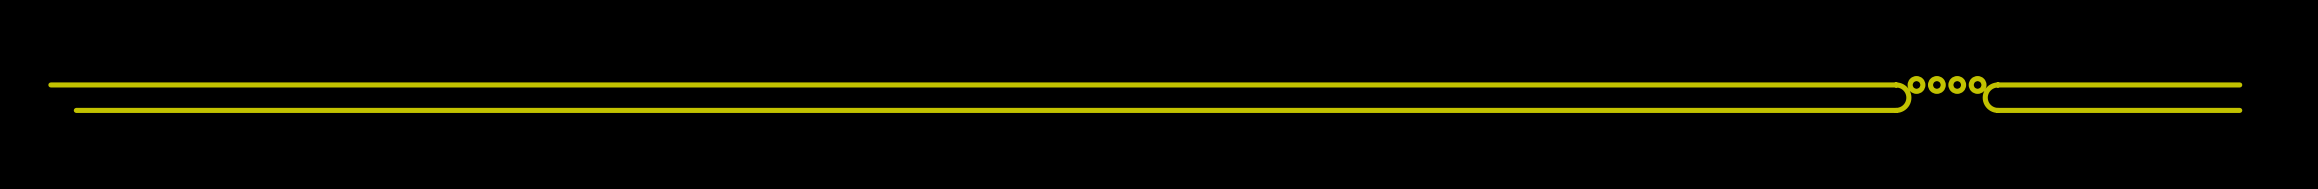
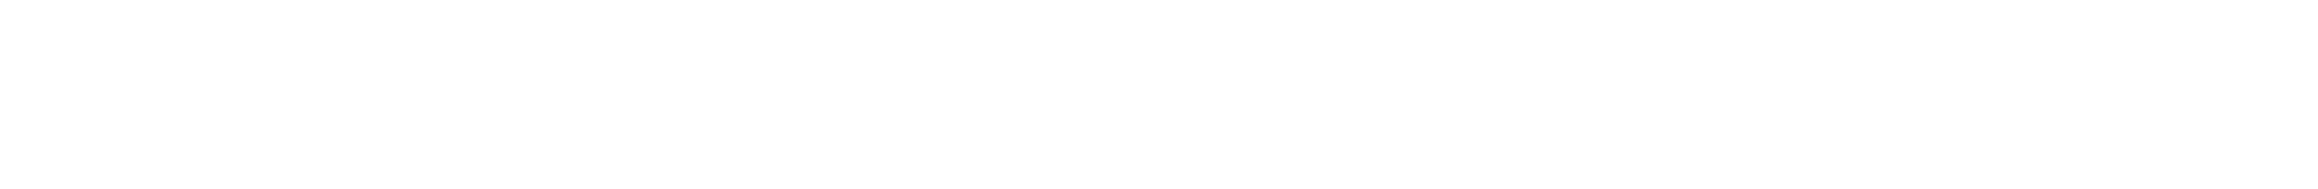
round board edge: [1907, 76, 1926, 94] -> none
round board edge: [1927, 76, 1946, 94] -> none
round board edge: [1948, 76, 1967, 94] -> none
round board edge: [1968, 76, 1987, 94] -> none
board edge: (50, 84) (1896, 84) (1905, 88) (1908, 97) (1905, 106) (1896, 110) (76, 110) -> none
board edge: (2239, 84) (1997, 84) (1988, 88) (1985, 97) (1988, 106) (1997, 110) (2239, 110) -> none

